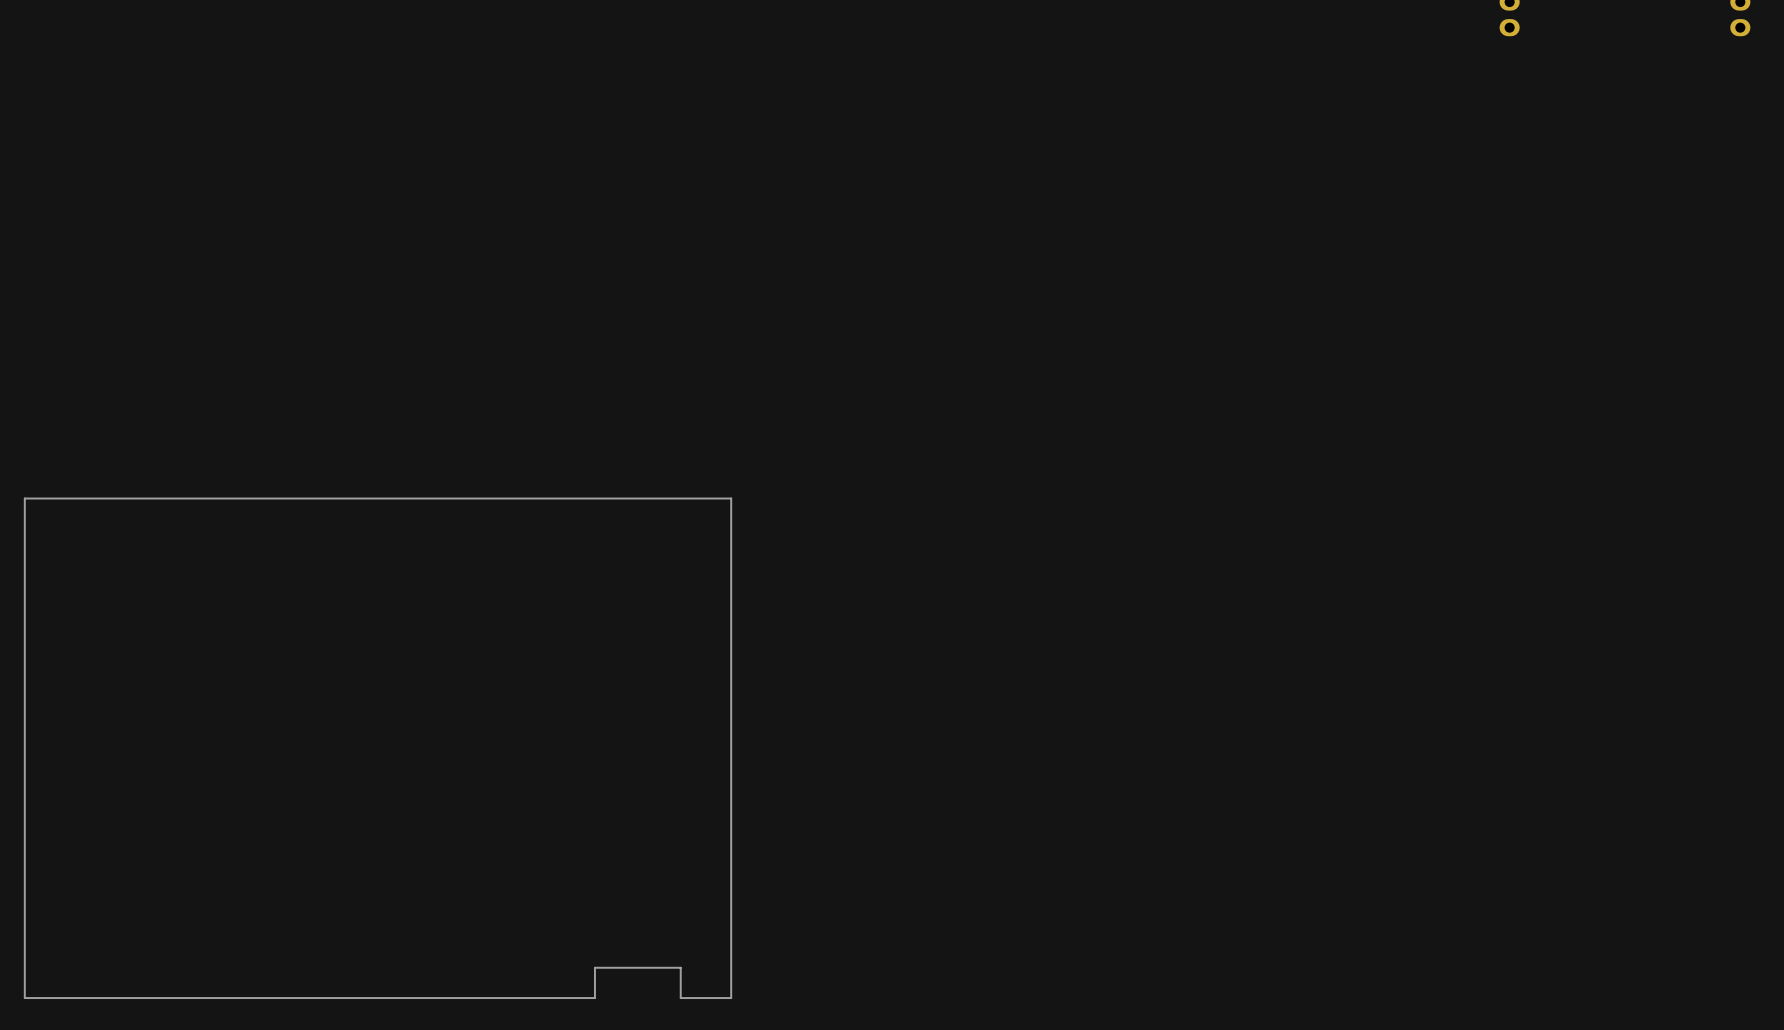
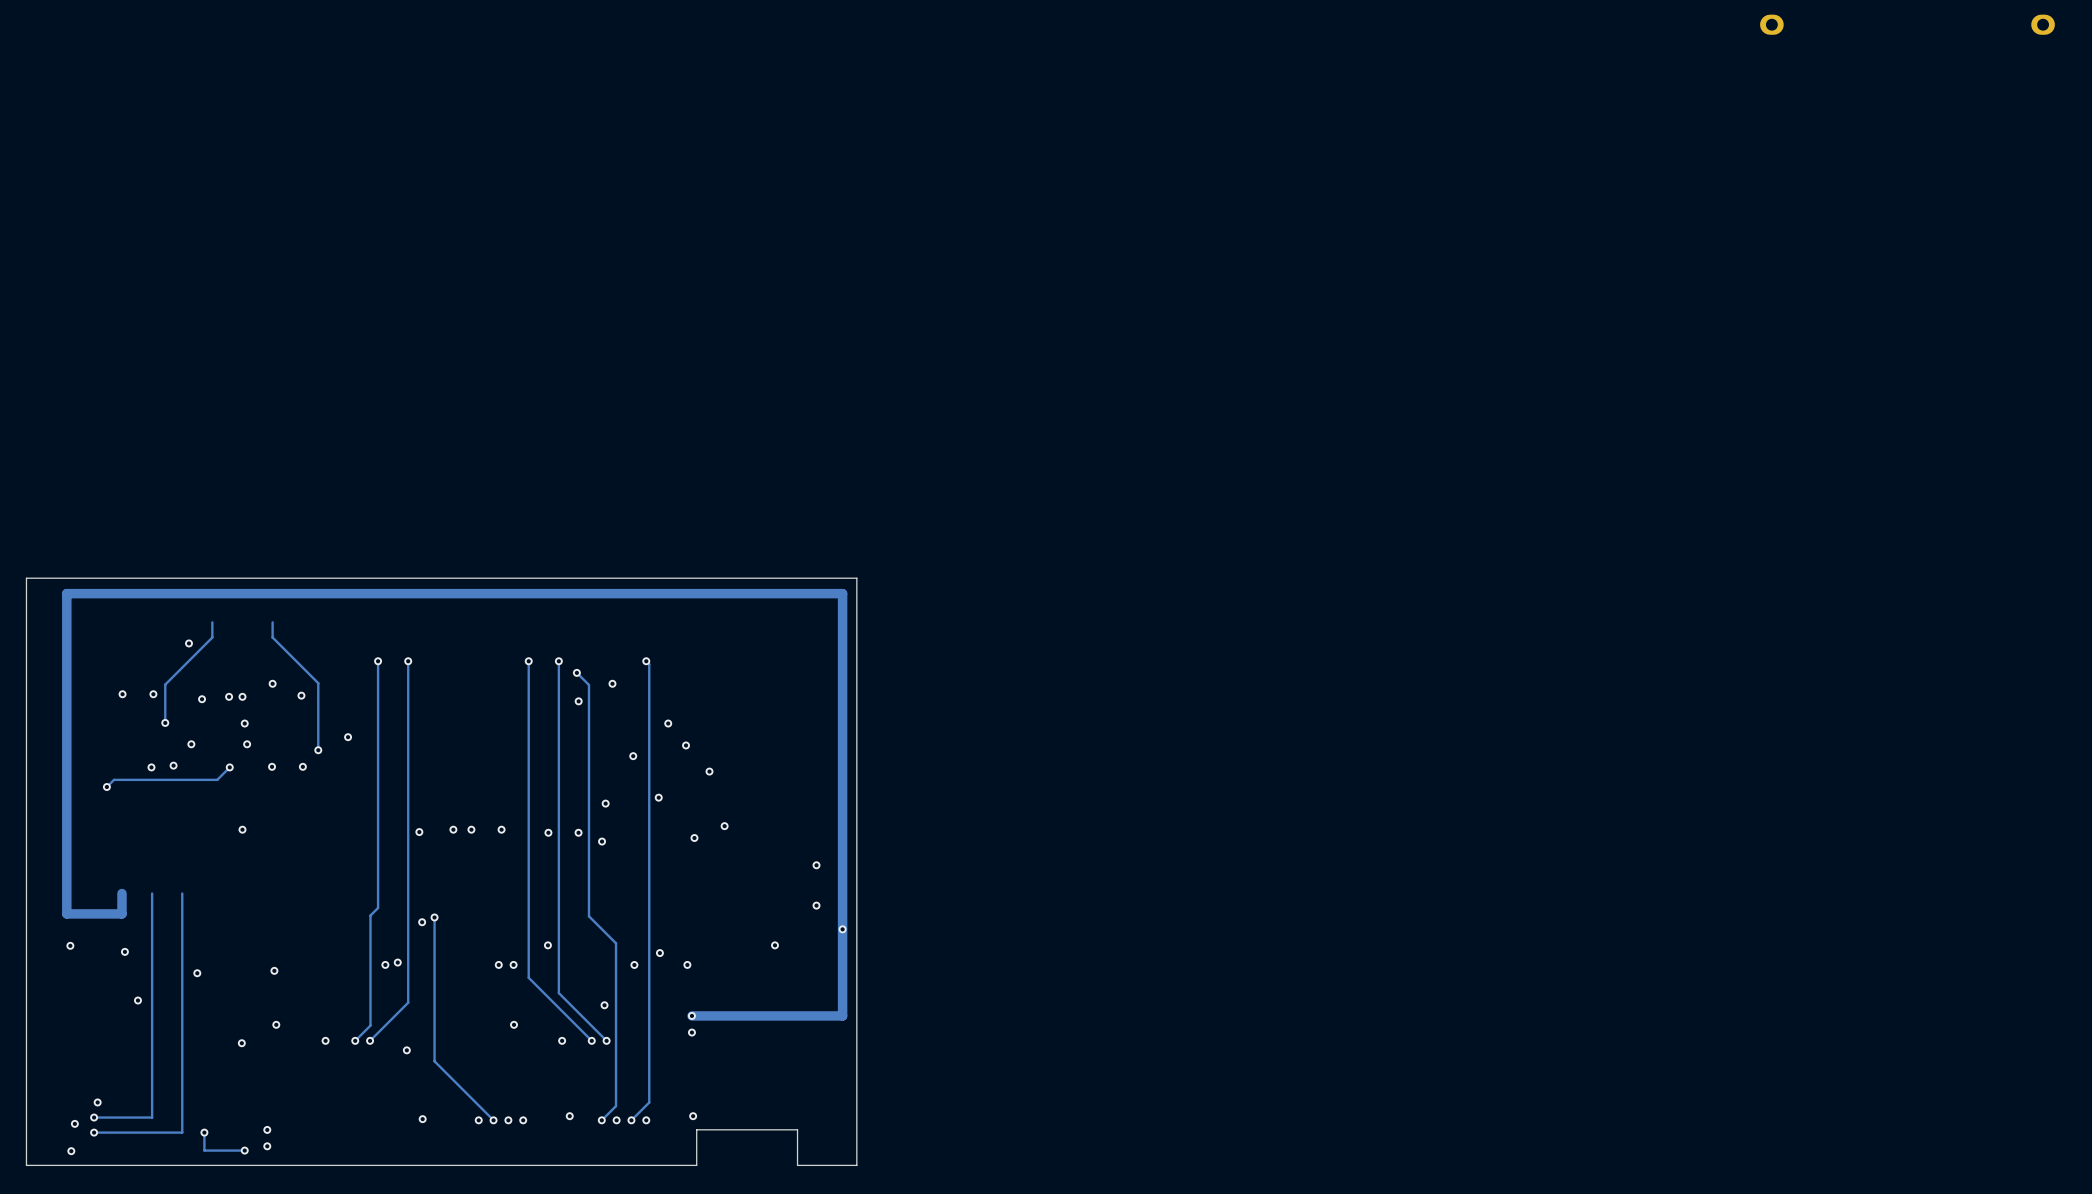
track: none -> (212, 622) (212, 637) (165, 684) (165, 722)
track: none -> (272, 622) (272, 637) (318, 683) (318, 750)
via: none -> (188, 643)
track: none -> (378, 661) (378, 907) (370, 915) (370, 1025) (355, 1040)
via: none -> (378, 661)
track: none -> (408, 661) (408, 1002) (370, 1040)
via: none -> (408, 661)
track: none -> (528, 661) (528, 977) (591, 1040)
via: none -> (528, 661)
track: none -> (558, 661) (558, 993) (606, 1040)
via: none -> (558, 661)
track: none -> (646, 661) (649, 664) (649, 1102) (631, 1120)
via: none -> (646, 661)
track: none -> (576, 672) (588, 684) (588, 916) (616, 943) (616, 1106) (601, 1120)
via: none -> (576, 672)
via: none -> (272, 683)
via: none -> (612, 683)
via: none -> (122, 694)
via: none -> (153, 694)
via: none -> (301, 695)
via: none -> (229, 696)
via: none -> (242, 696)
via: none -> (202, 699)
via: none -> (578, 701)
via: none -> (165, 722)
via: none -> (244, 723)
via: none -> (668, 723)
via: none -> (348, 737)
via: none -> (191, 744)
via: none -> (247, 744)
via: none -> (686, 745)
via: none -> (318, 750)
via: none -> (633, 756)
via: none -> (173, 765)
via: none -> (272, 766)
via: none -> (302, 766)
via: none -> (151, 767)
track: none -> (229, 767) (217, 779) (114, 779) (106, 786)
via: none -> (229, 767)
via: none -> (709, 771)
via: none -> (106, 786)
via: none -> (658, 797)
via: none -> (605, 803)
via: none -> (724, 826)
via: none -> (242, 829)
via: none -> (453, 829)
via: none -> (471, 829)
via: none -> (501, 829)
via: none -> (419, 832)
via: none -> (548, 832)
via: none -> (578, 832)
via: none -> (694, 838)
via: none -> (602, 841)
via: none -> (816, 865)
track: none -> (122, 893) (122, 913) (66, 913) (66, 593) (842, 593) (842, 1015) (691, 1015)
track: none -> (152, 893) (152, 1117) (94, 1117)
track: none -> (182, 893) (182, 1132) (94, 1132)
via: none -> (816, 905)
track: none -> (434, 917) (434, 1061) (493, 1120)
via: none -> (434, 917)
via: none -> (422, 922)
via: none -> (842, 929)
via: none -> (547, 945)
via: none -> (774, 945)
via: none -> (70, 945)
via: none -> (124, 951)
via: none -> (659, 953)
via: none -> (397, 962)
via: none -> (385, 964)
via: none -> (498, 964)
via: none -> (513, 964)
via: none -> (634, 964)
via: none -> (687, 964)
via: none -> (274, 970)
via: none -> (197, 973)
via: none -> (137, 1000)
via: none -> (604, 1005)
via: none -> (691, 1015)
via: none -> (276, 1024)
via: none -> (514, 1024)
via: none -> (691, 1032)
via: none -> (325, 1040)
via: none -> (355, 1040)
via: none -> (370, 1040)
via: none -> (562, 1040)
via: none -> (591, 1040)
via: none -> (606, 1040)
via: none -> (241, 1043)
via: none -> (406, 1050)
via: none -> (97, 1102)
via: none -> (569, 1116)
via: none -> (693, 1116)
via: none -> (94, 1117)
via: none -> (422, 1119)
via: none -> (478, 1120)
via: none -> (493, 1120)
via: none -> (508, 1120)
via: none -> (523, 1120)
via: none -> (601, 1120)
via: none -> (616, 1120)
via: none -> (631, 1120)
via: none -> (646, 1120)
via: none -> (74, 1123)
via: none -> (267, 1129)
via: none -> (94, 1132)
track: none -> (204, 1132) (204, 1150) (244, 1150)
via: none -> (204, 1132)
via: none -> (267, 1146)
via: none -> (71, 1151)
via: none -> (244, 1150)

